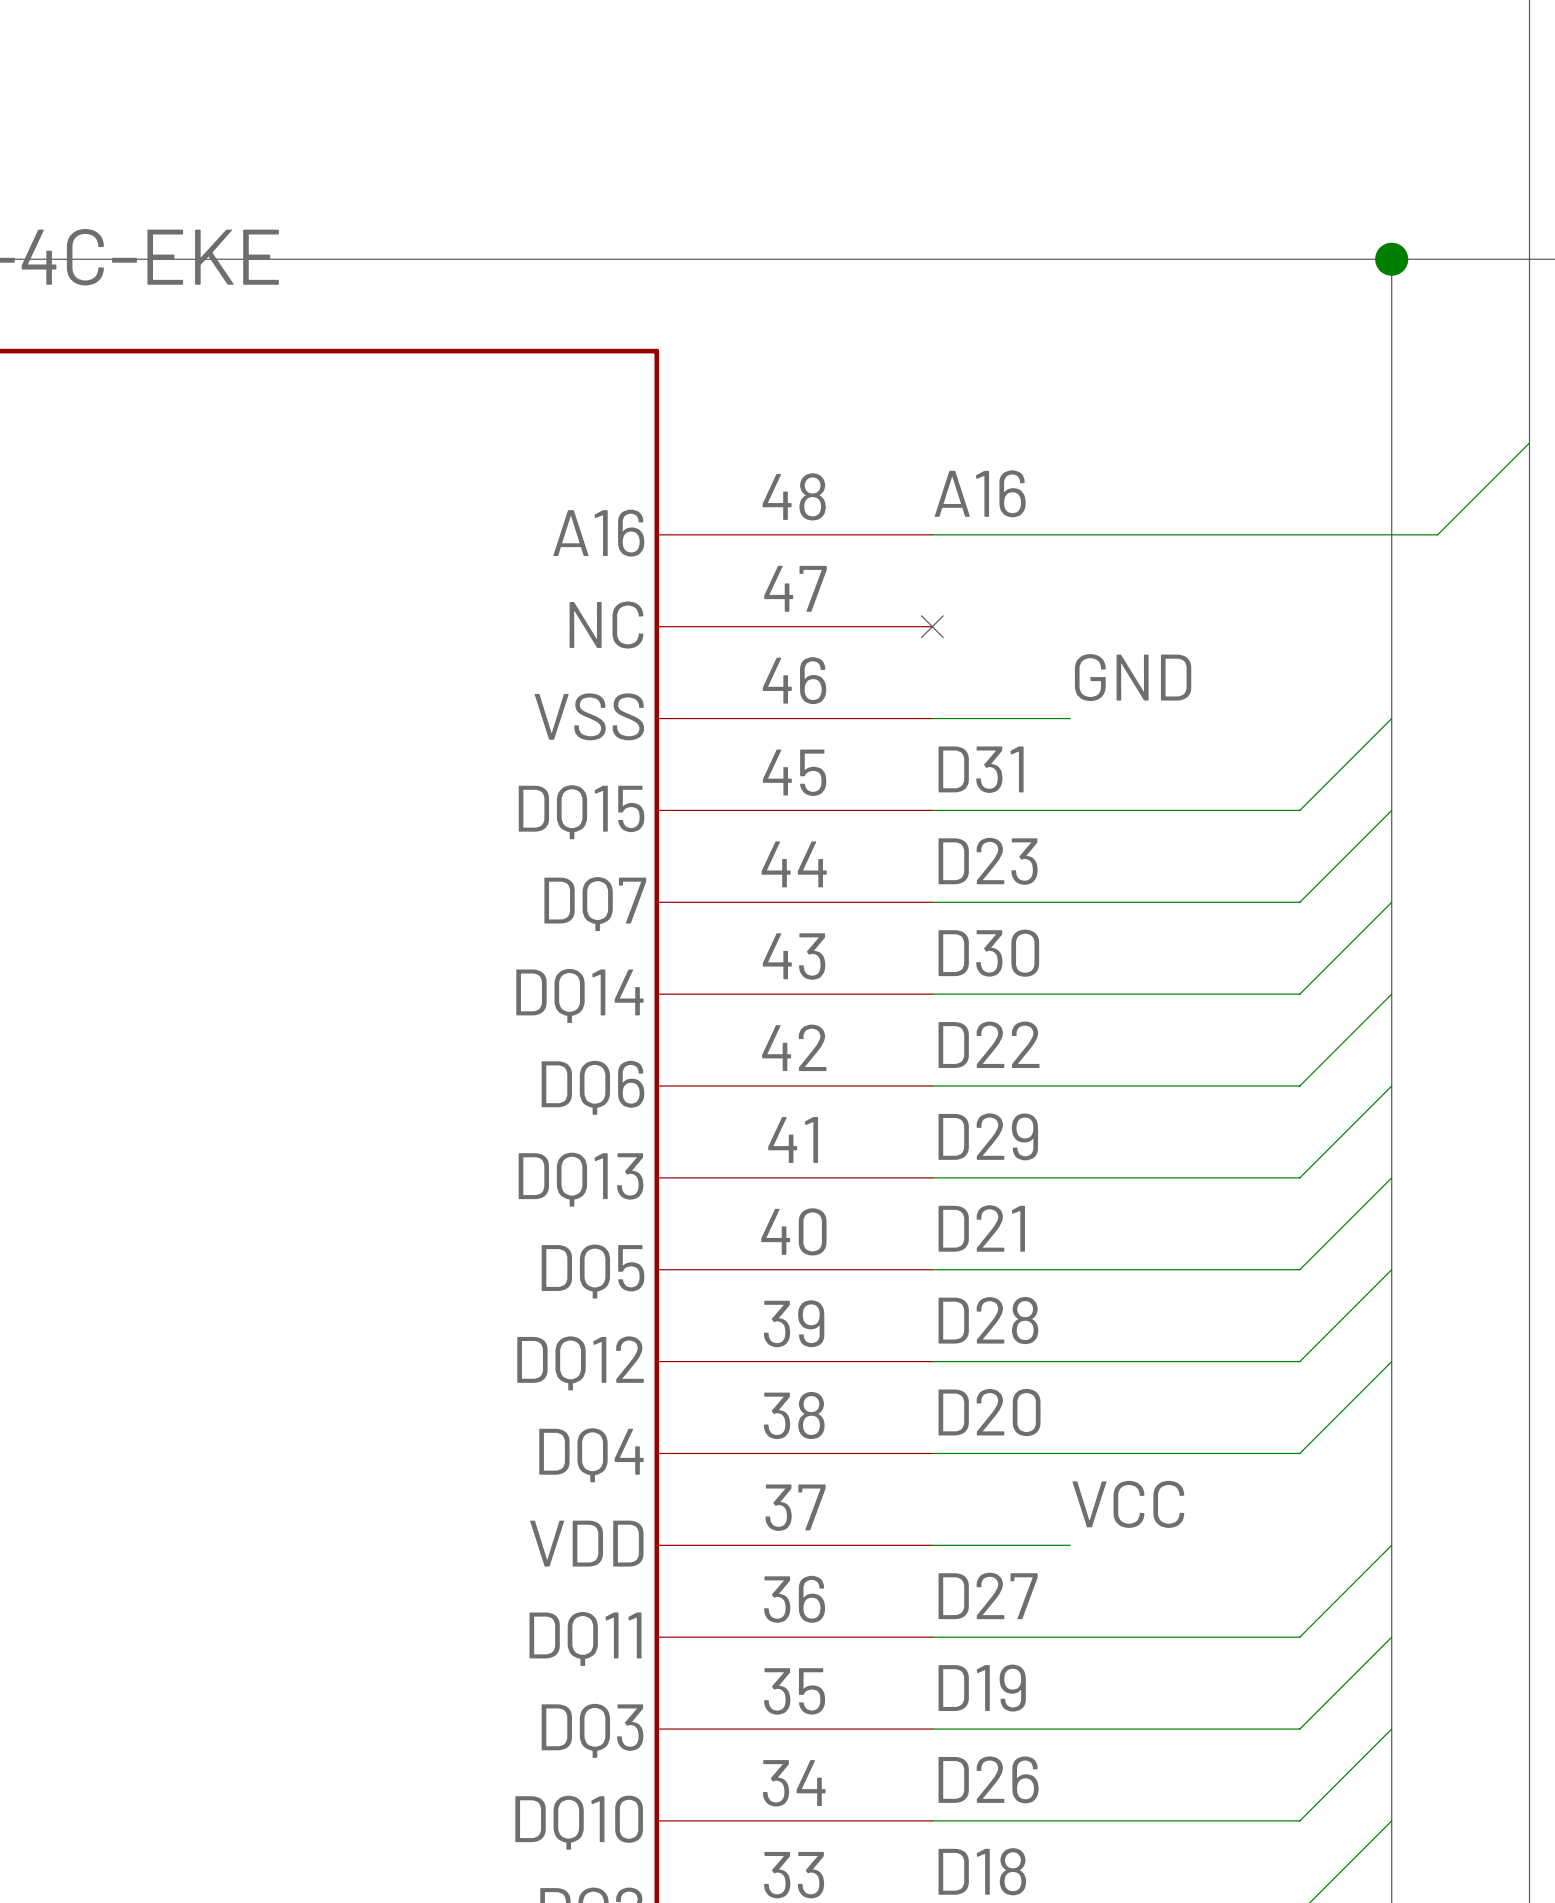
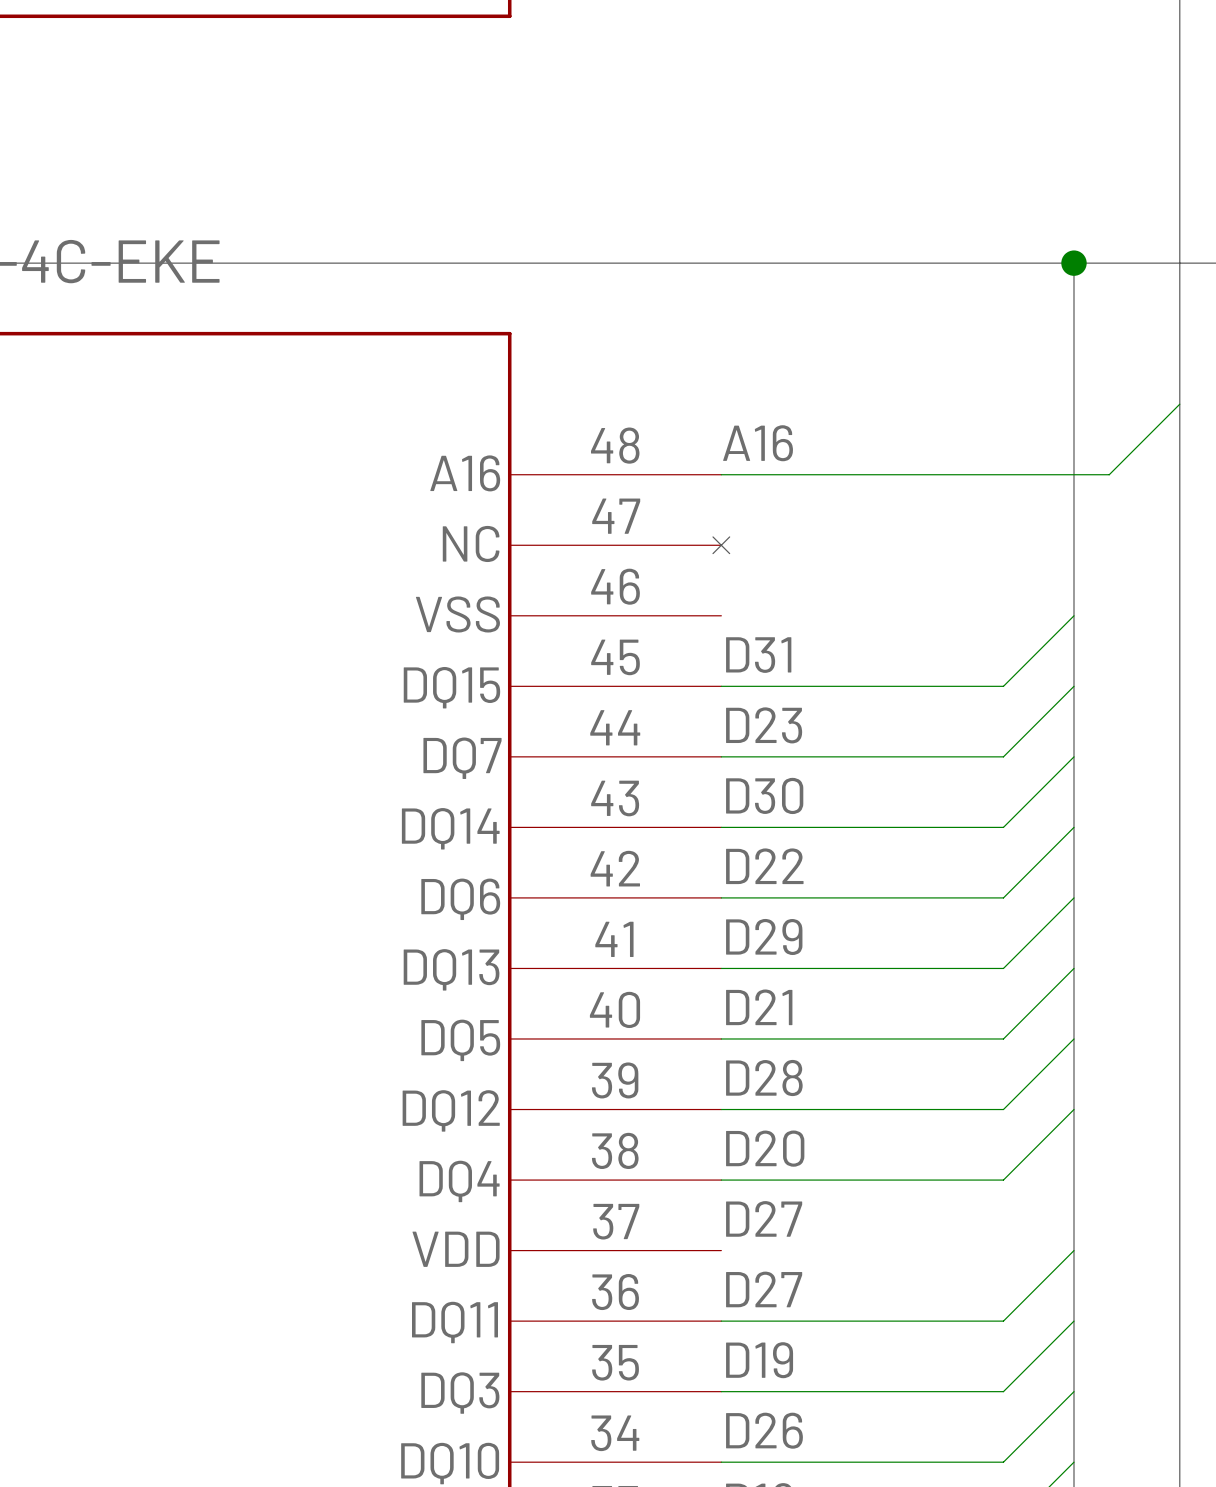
label: GND (1133, 677) -> none
wire: (932, 718) (1070, 718) -> none
label: none -> D27 (764, 1218)
label: VCC (1128, 1504) -> none
wire: (932, 1545) (1070, 1545) -> none

